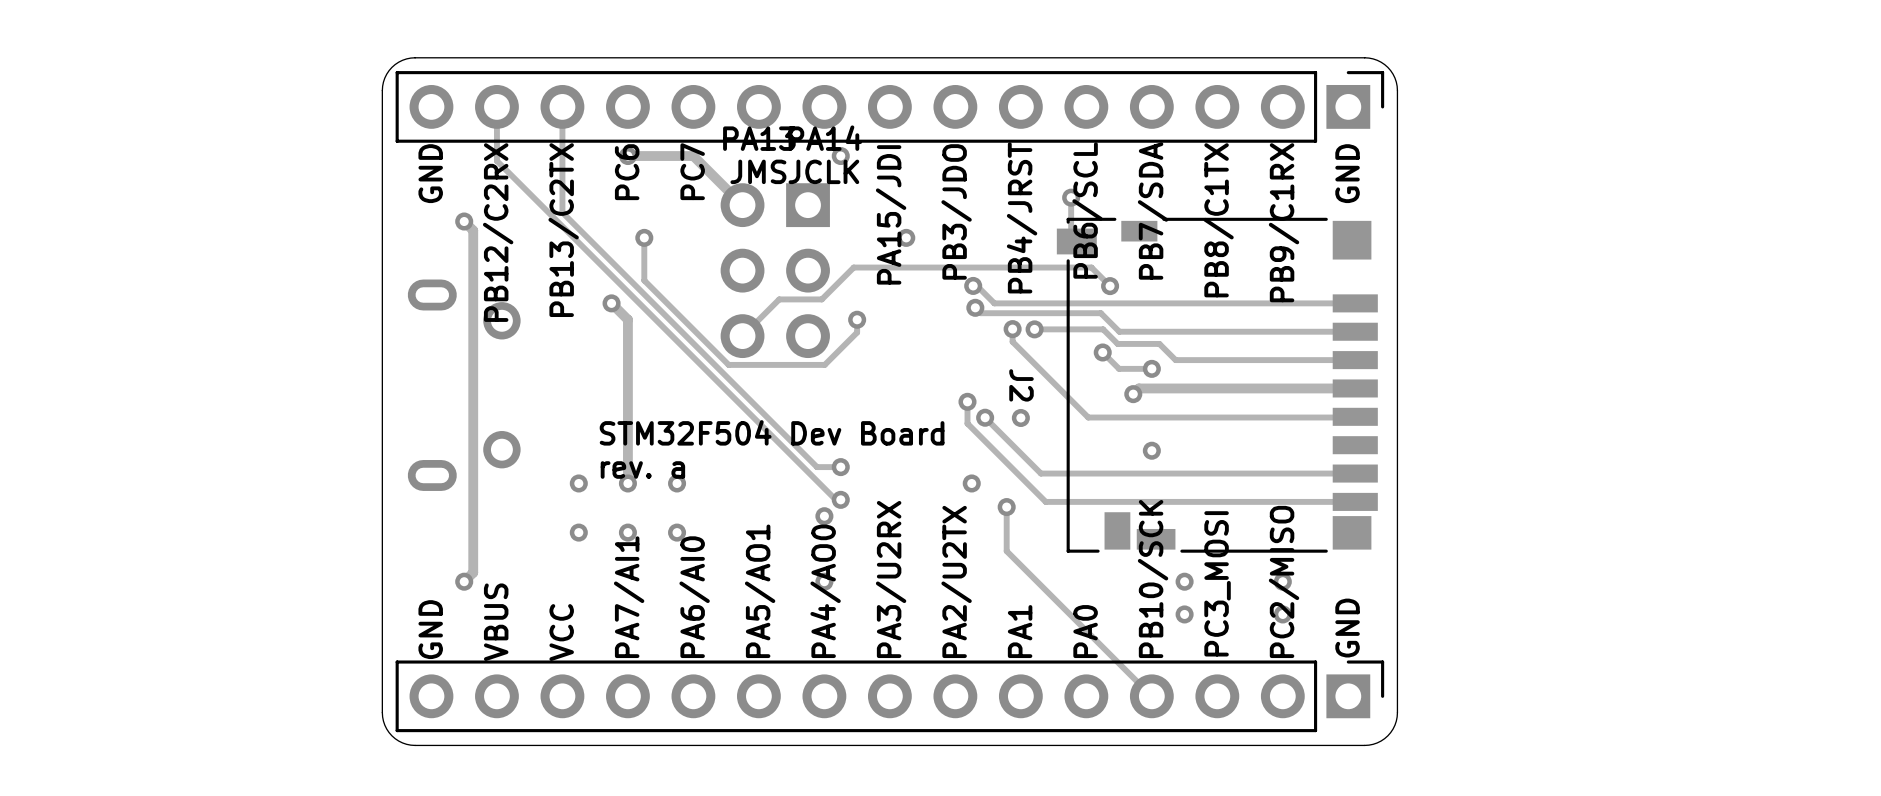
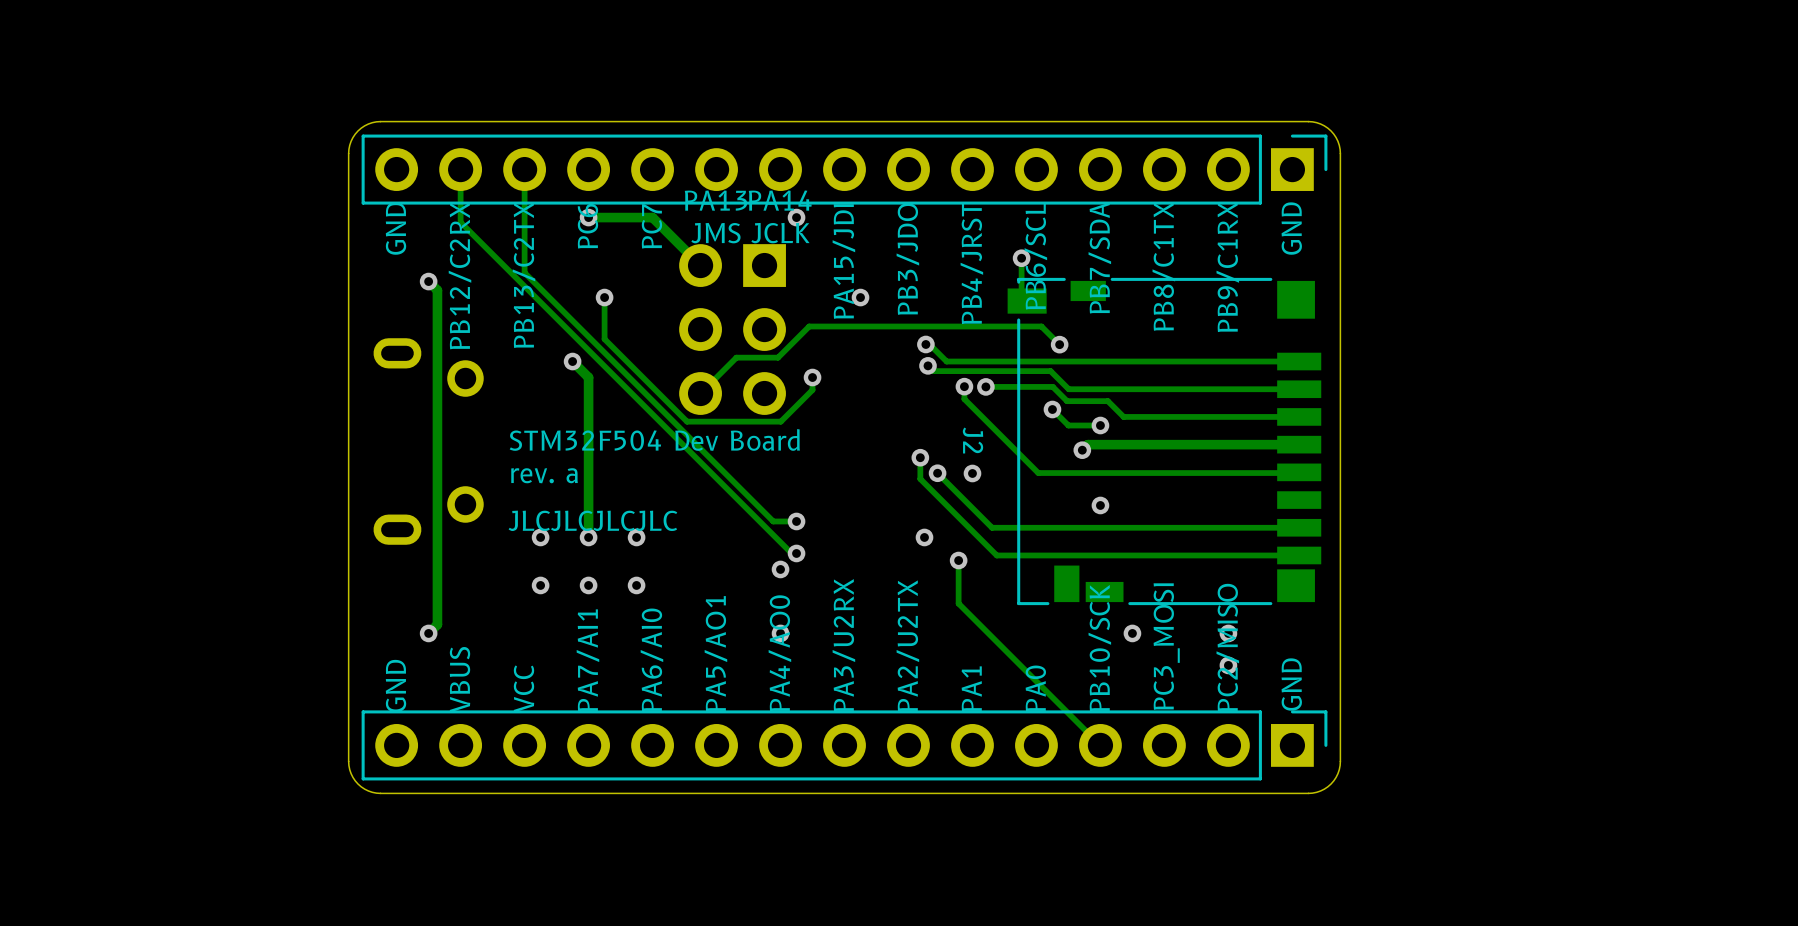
text position: STM32F504 Dev Board (772, 432) -> STM32F504 Dev Board (654, 439)
text: none -> JLCJLCJLCJLC (592, 520)
text position: rev. a (642, 470) -> rev. a (544, 475)
via: (1184, 614) -> none

